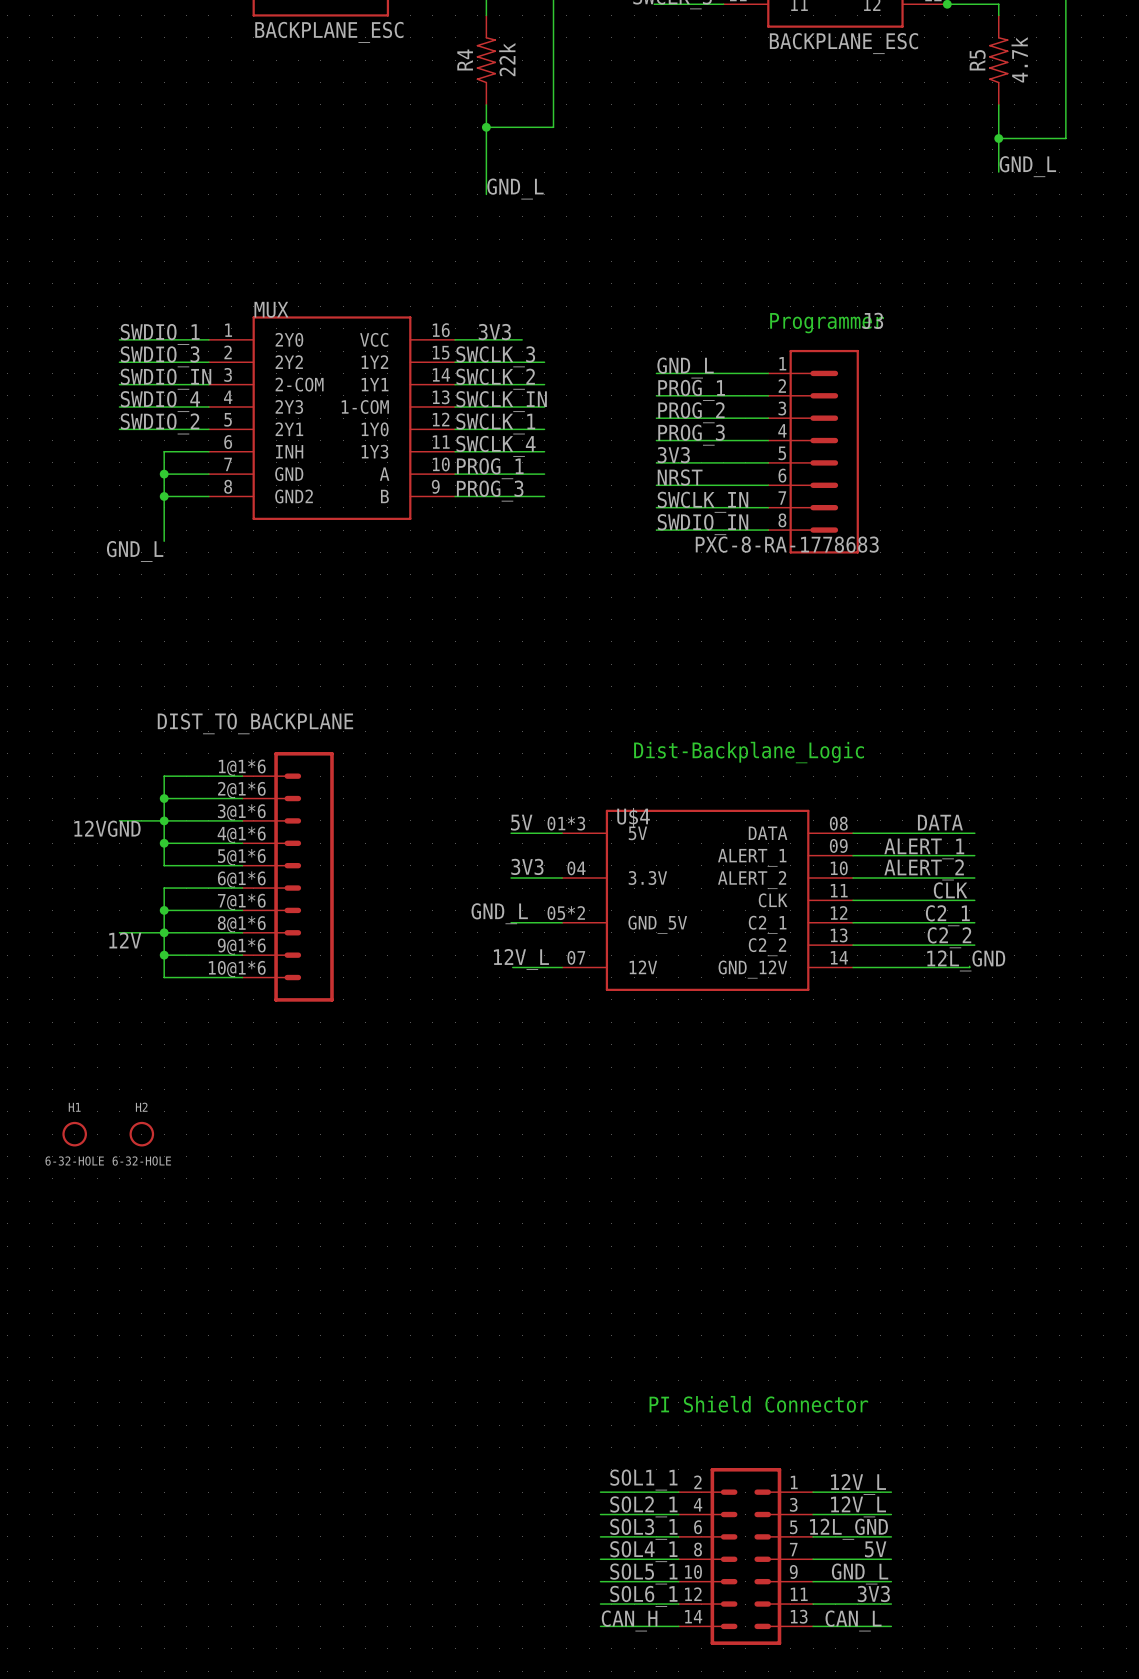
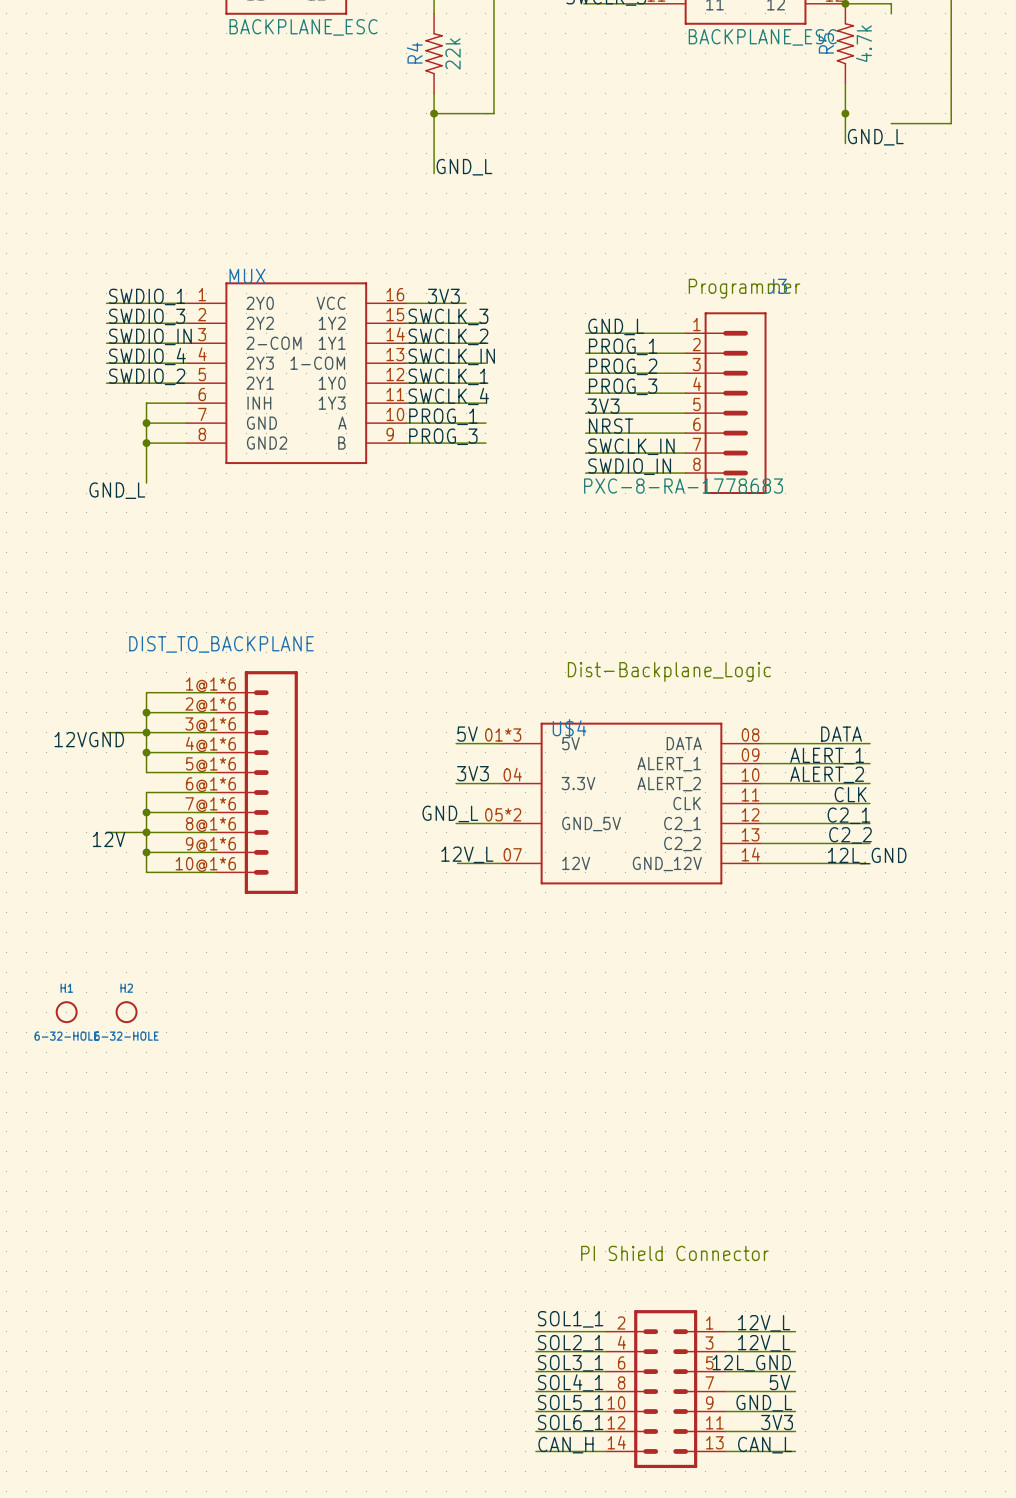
R5 position: (998, 60) -> (845, 43)
wire: (998, 104) (998, 172) -> (845, 83) (845, 143)
junction position: (998, 138) -> (845, 113)
label position: GND_L (1027, 166) -> GND_L (875, 137)

